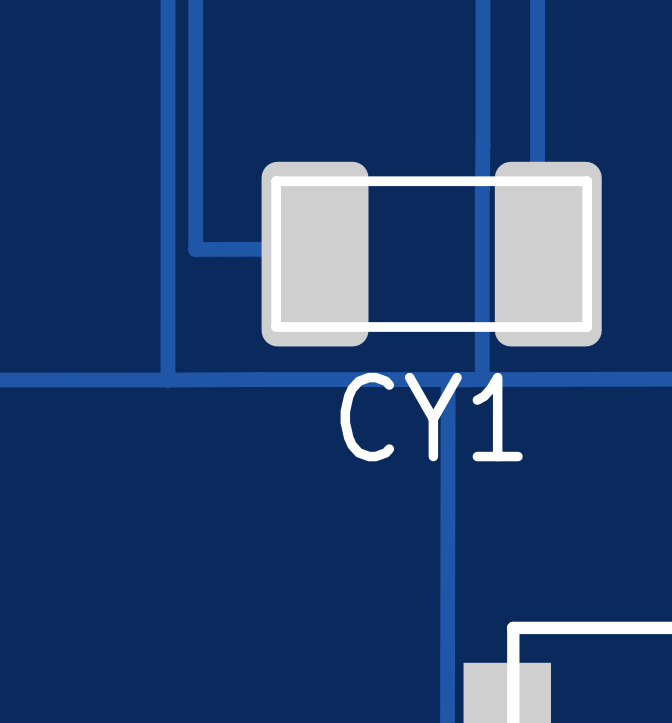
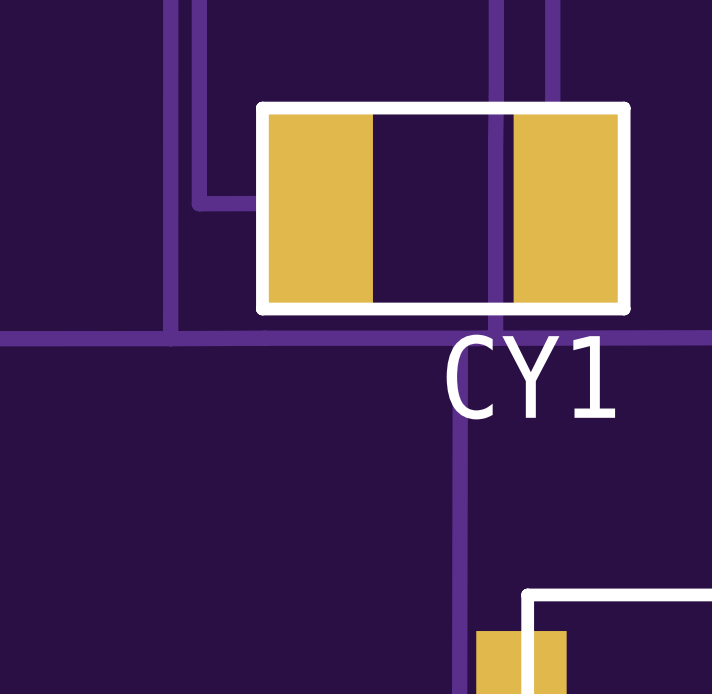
CY1 footprint: [261, 161, 602, 347] -> [256, 101, 631, 316]
CY1 name position: CY1 (431, 417) -> CY1 (530, 377)

